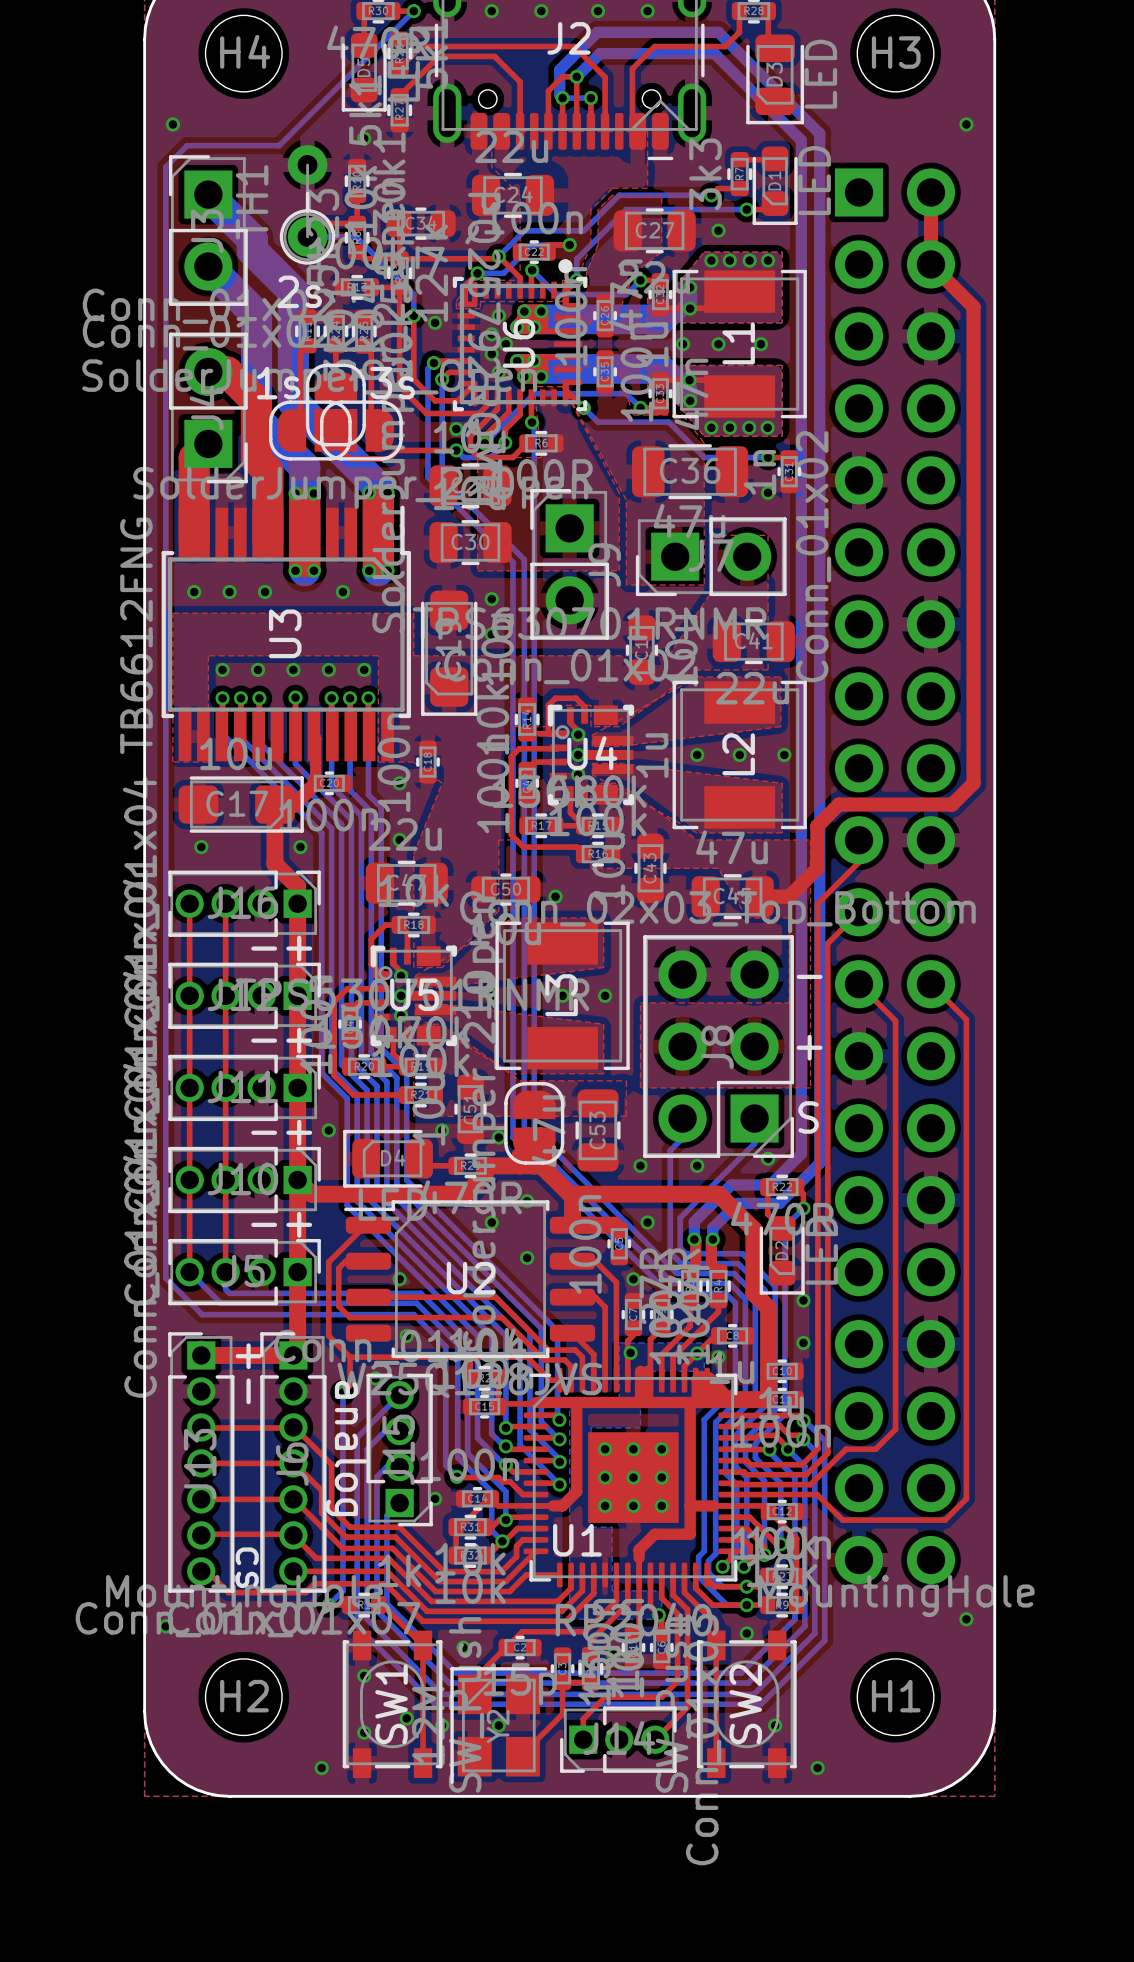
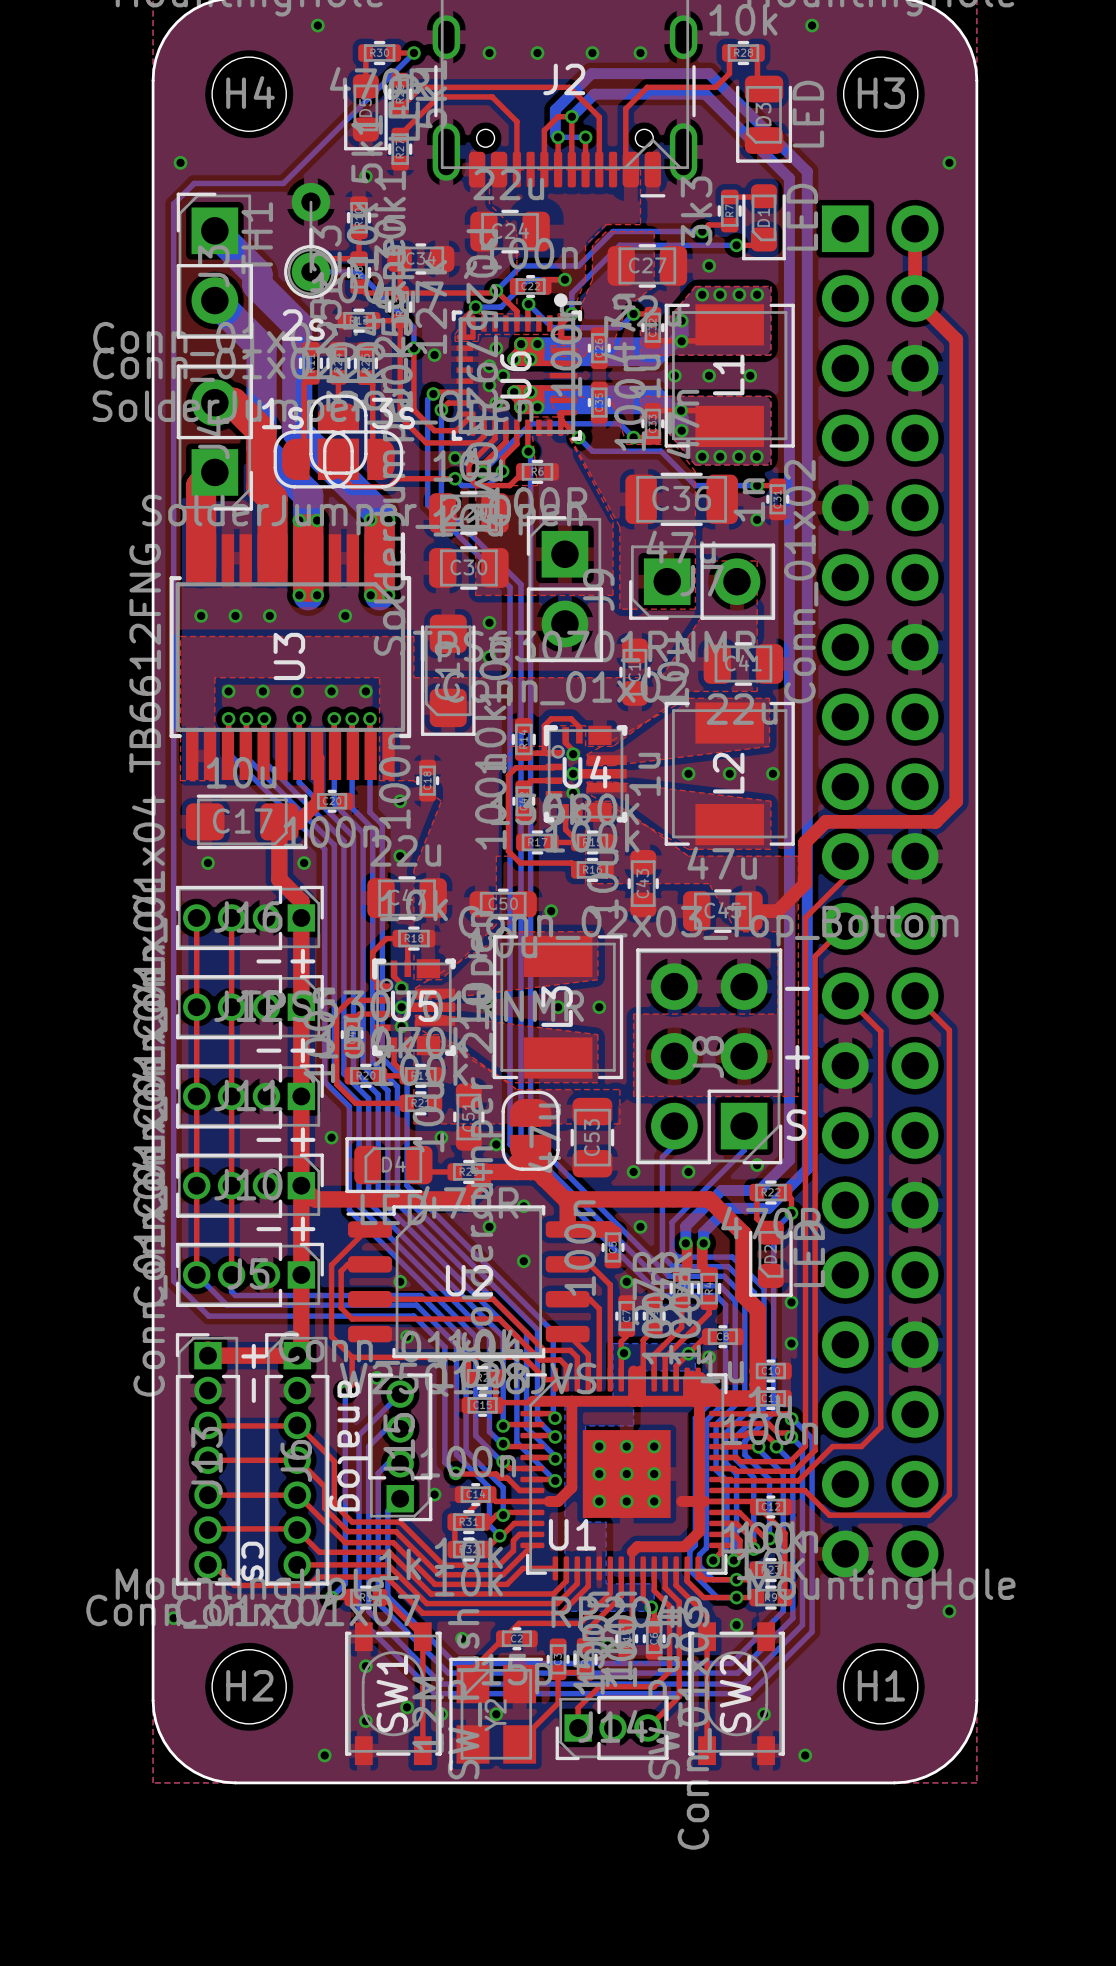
top track: (690, 1406) (690, 1534) (654, 1534) (639, 1549) (639, 1557) -> (699, 1401) (699, 1531) (684, 1546) (637, 1546) (632, 1551)

